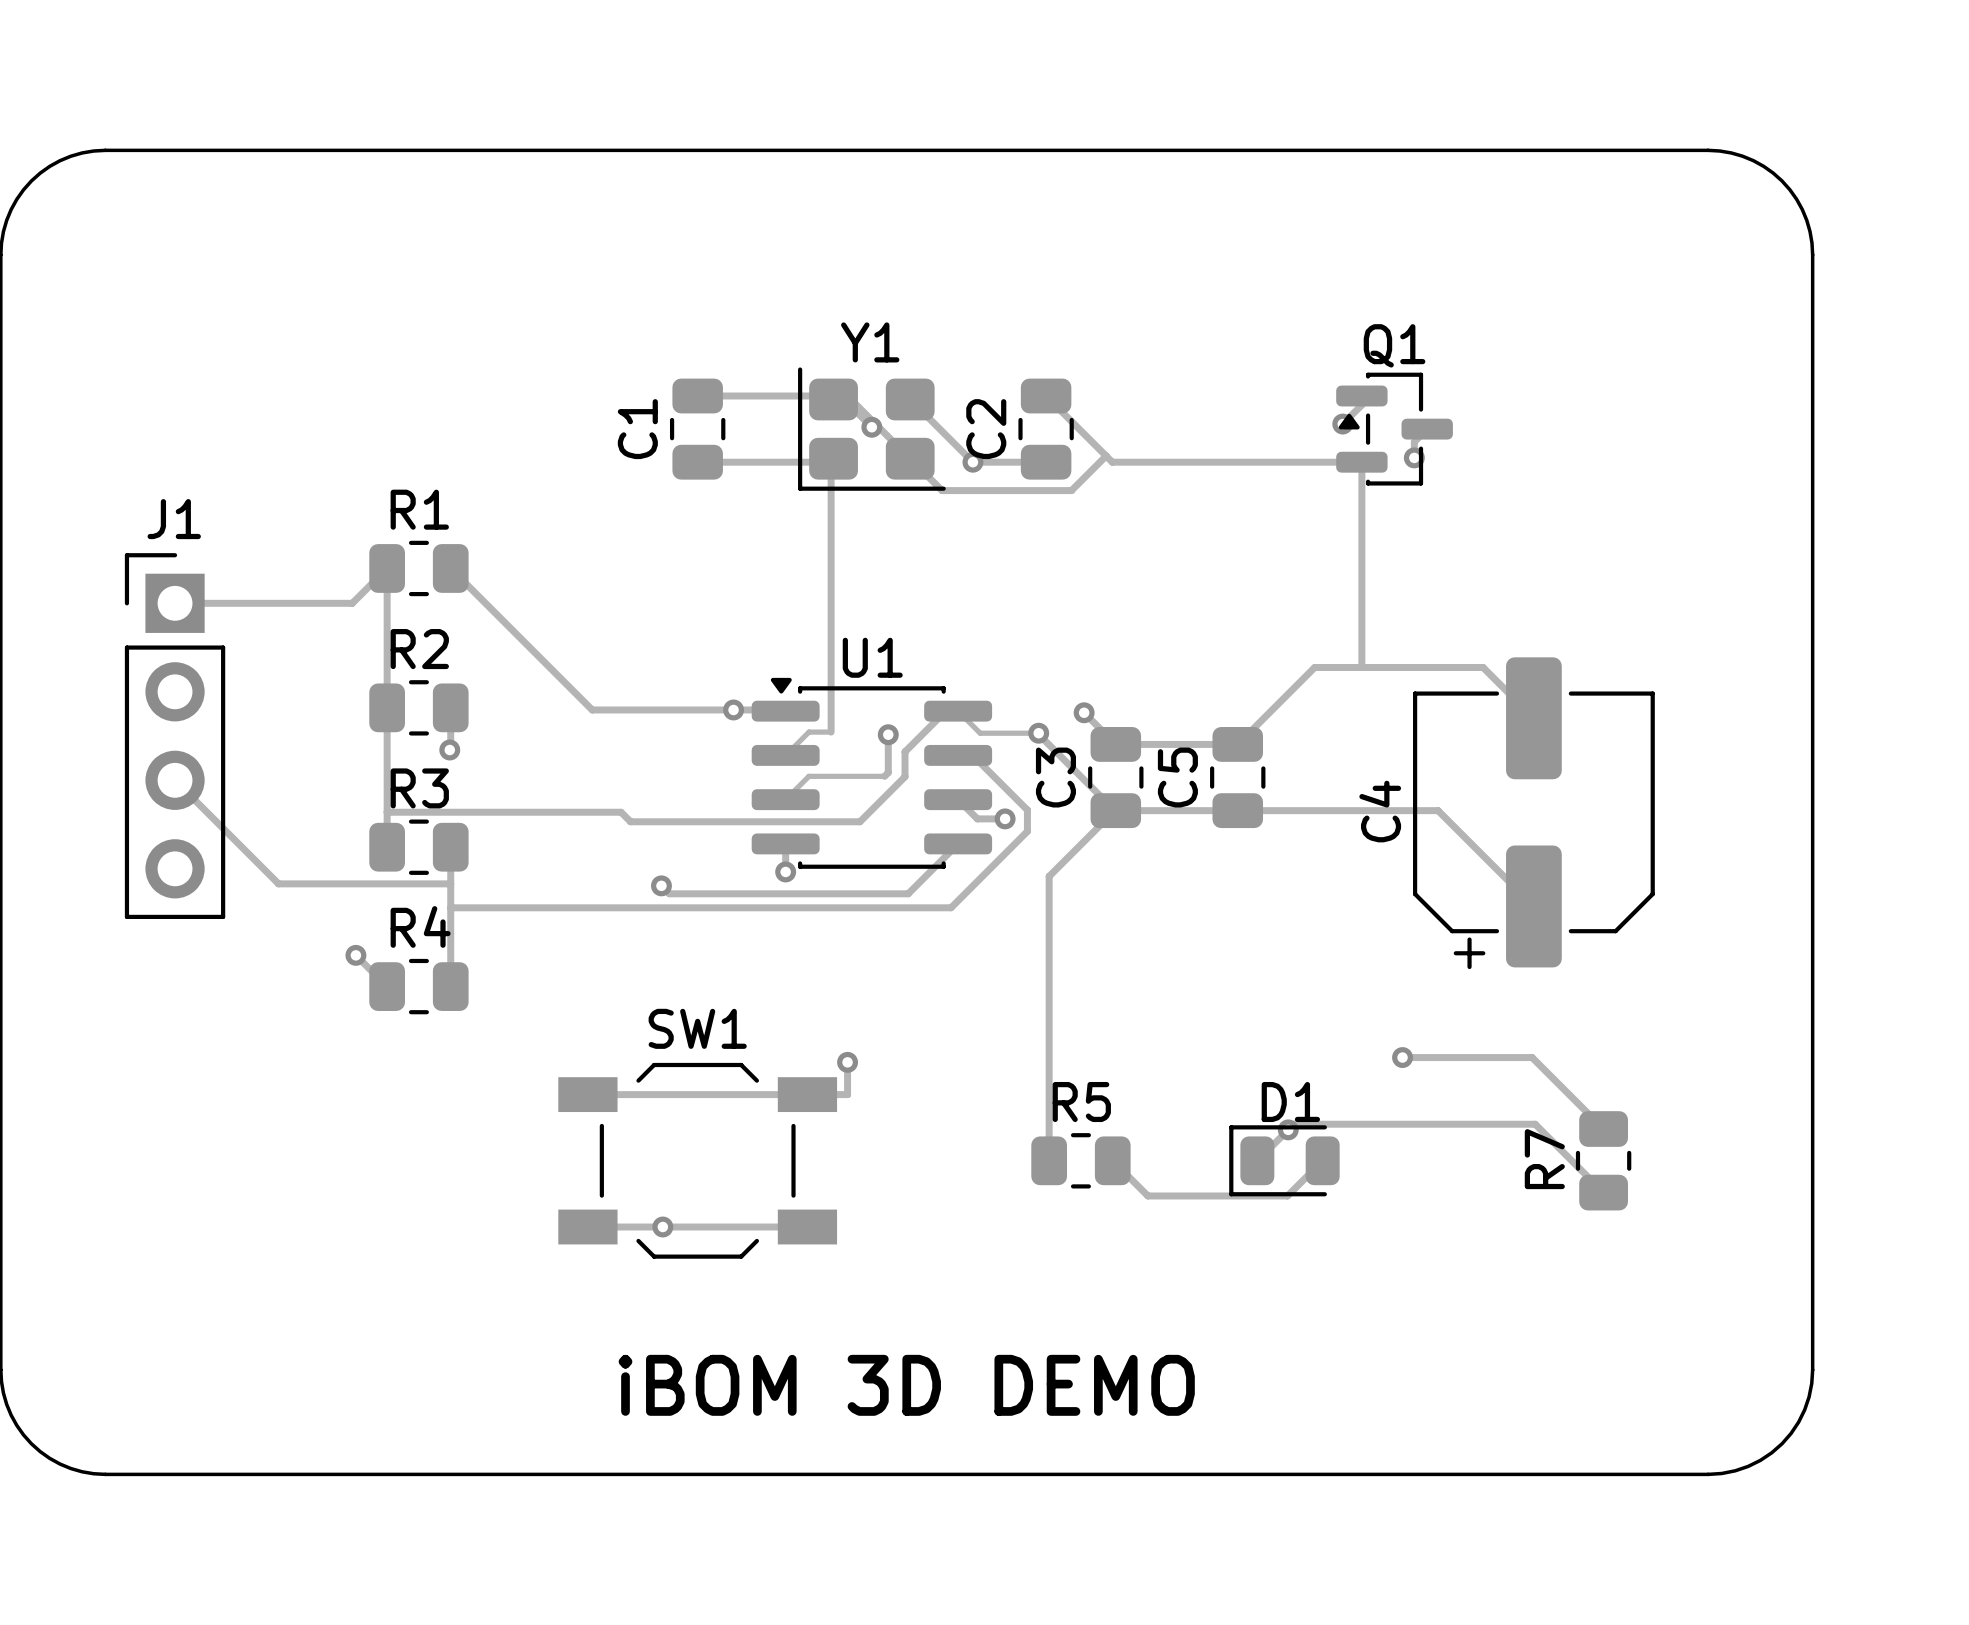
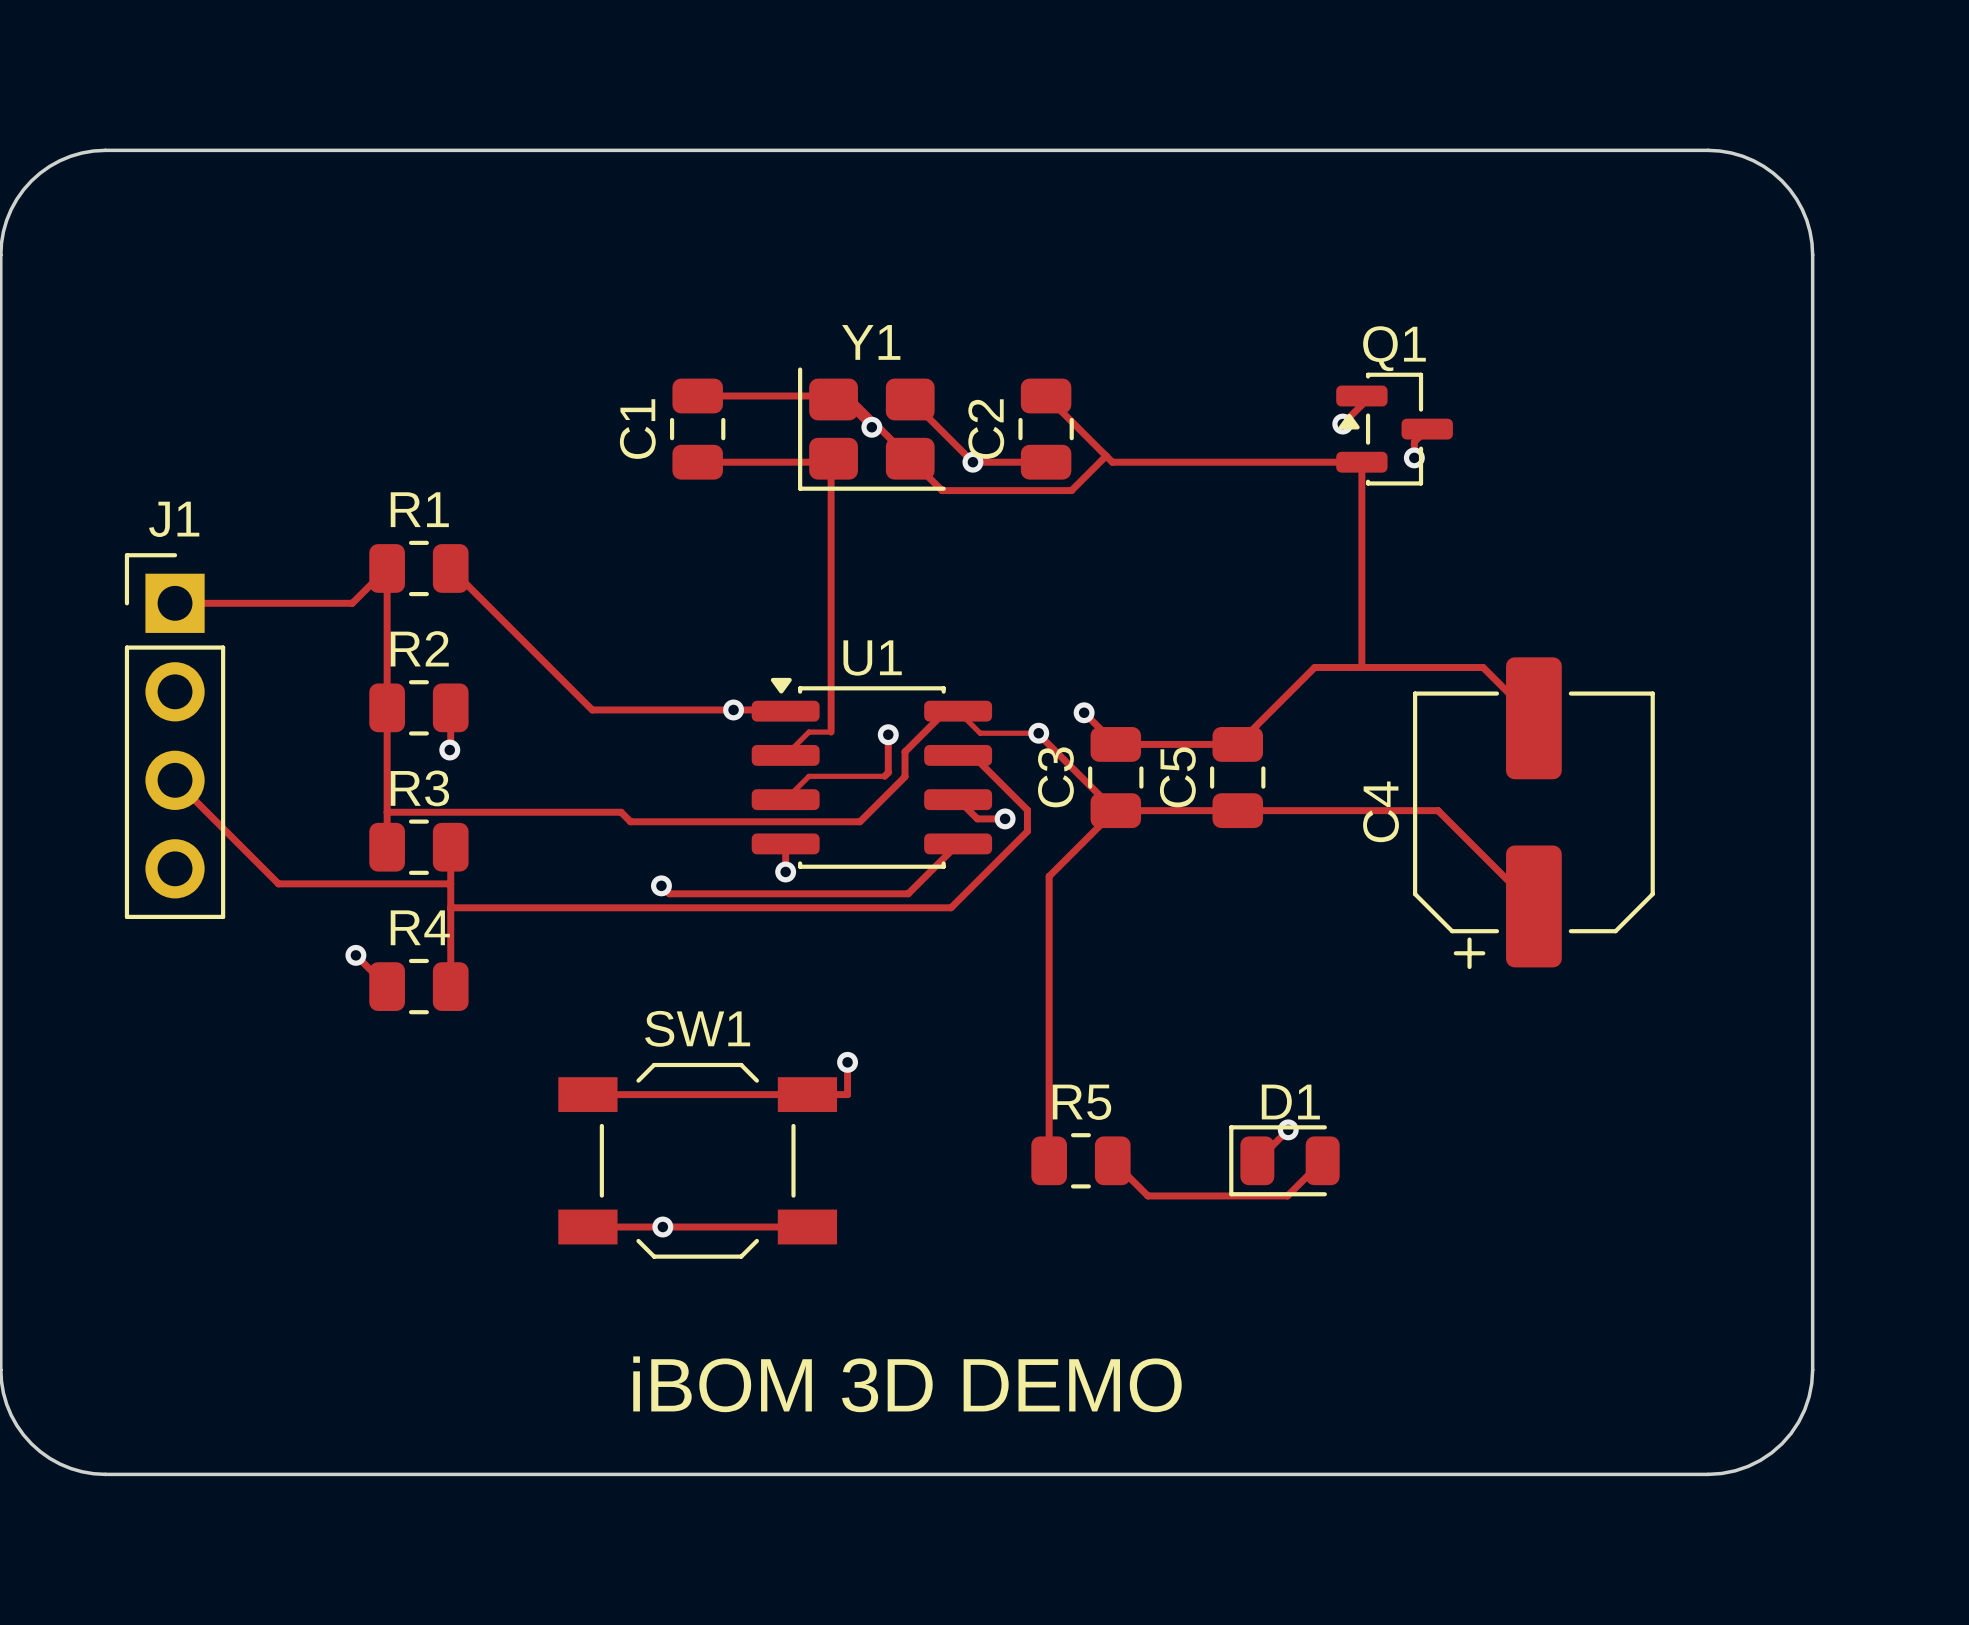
track: (1402, 1057) (1532, 1057) (1603, 1129) -> none
via: (1402, 1057) -> none
track: (1288, 1129) (1293, 1124) (1535, 1124) (1603, 1192) -> none
R7: (1603, 1160) -> none

